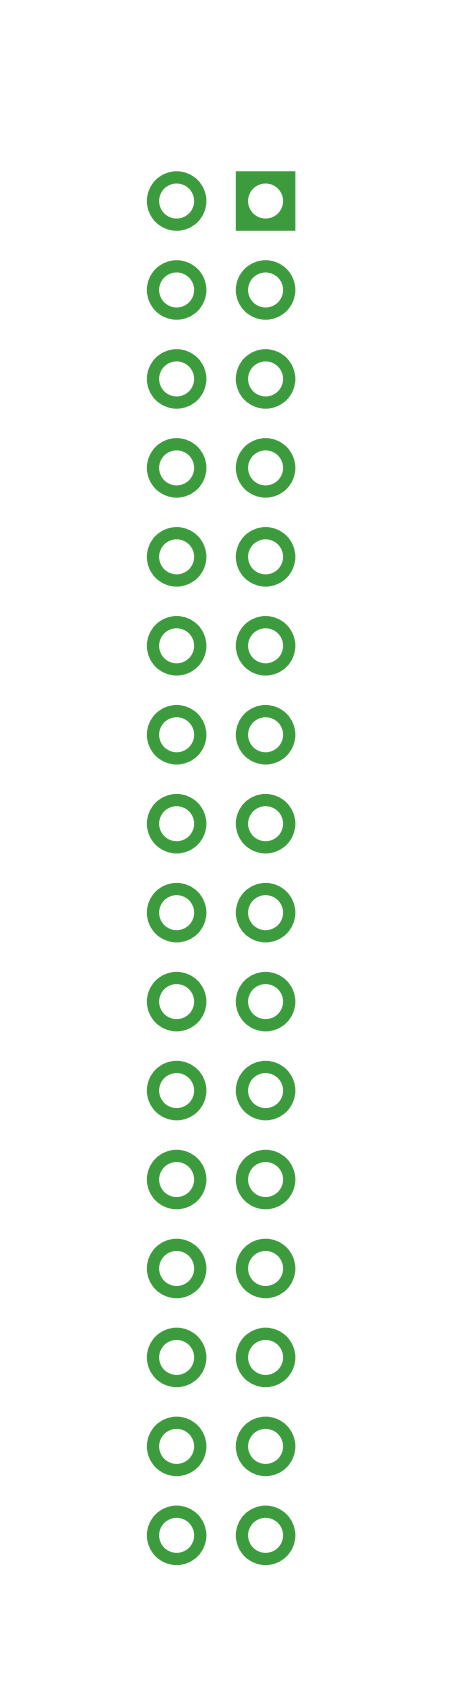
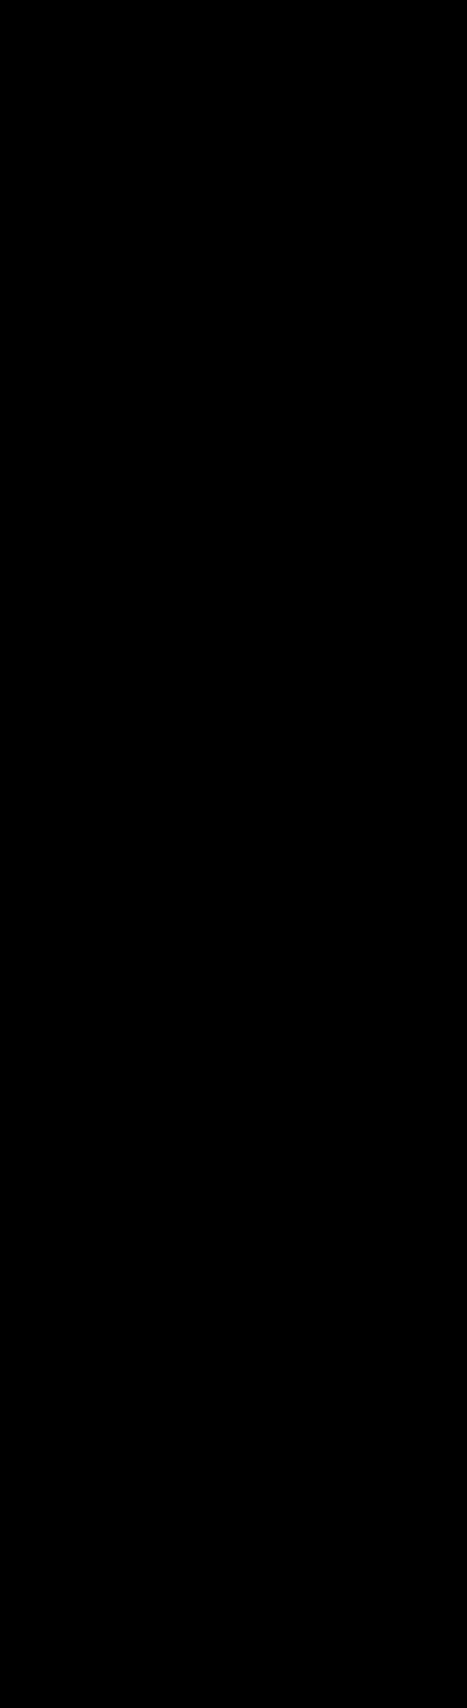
part: (221, 868) -> none

